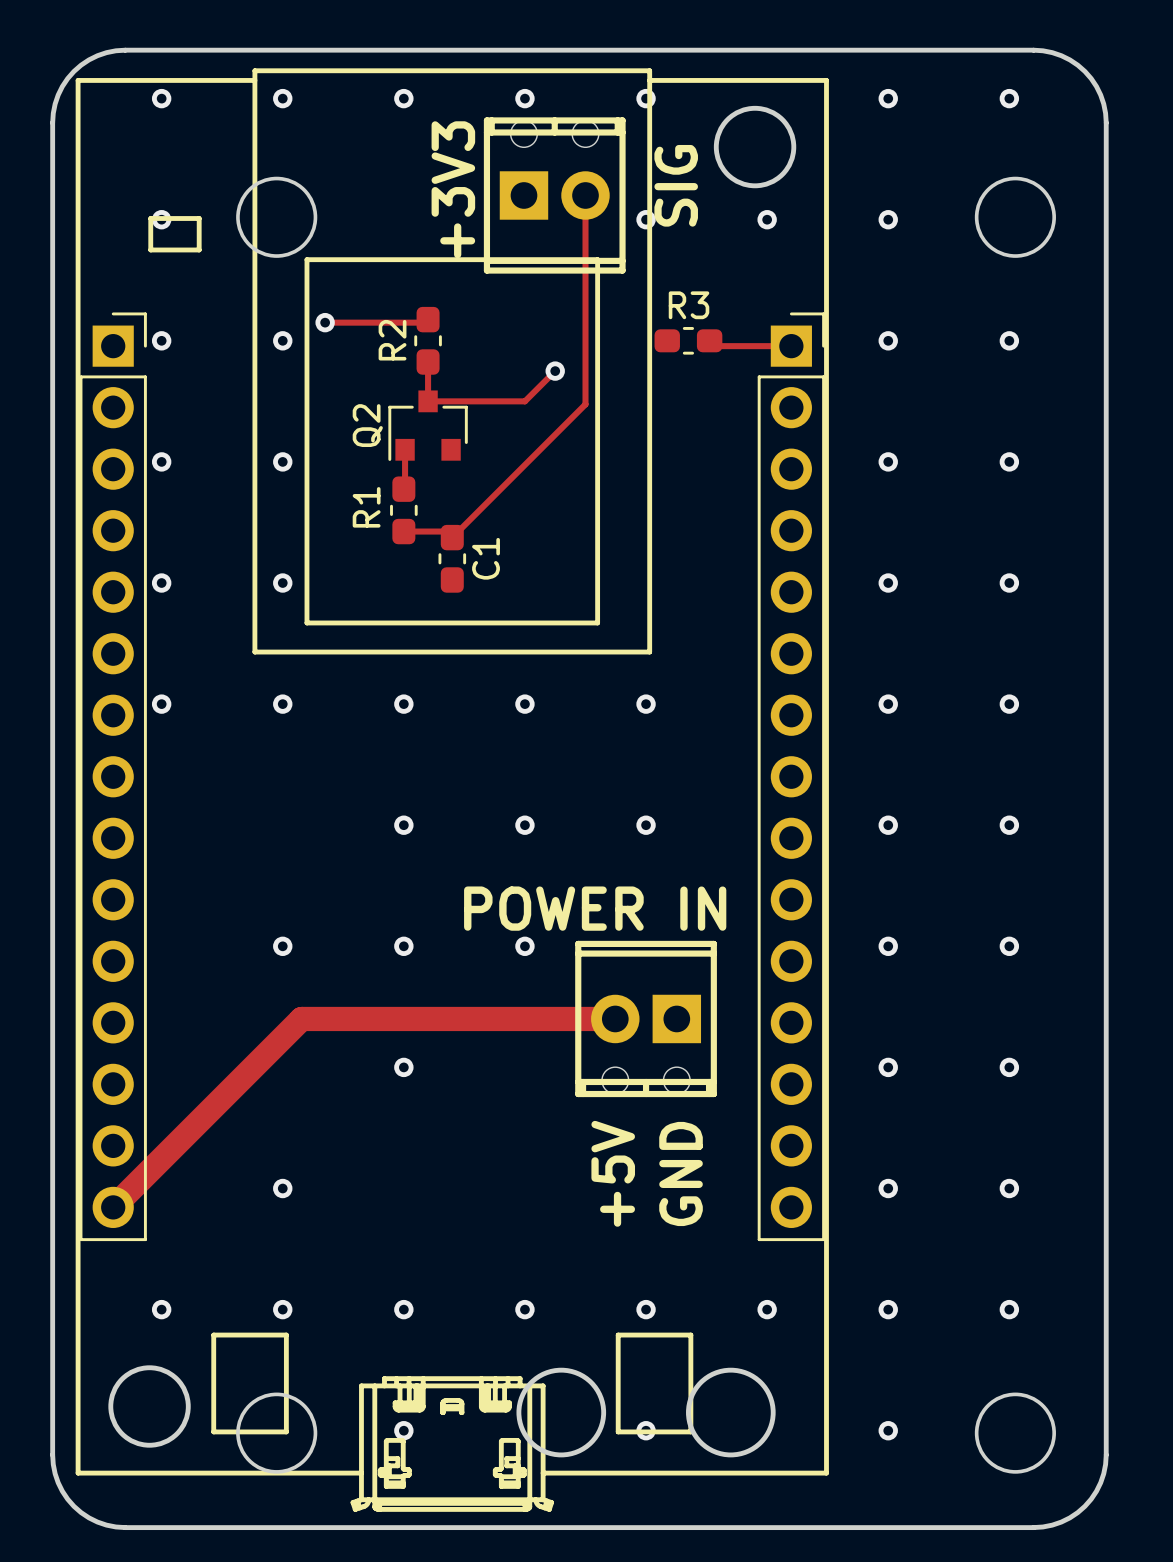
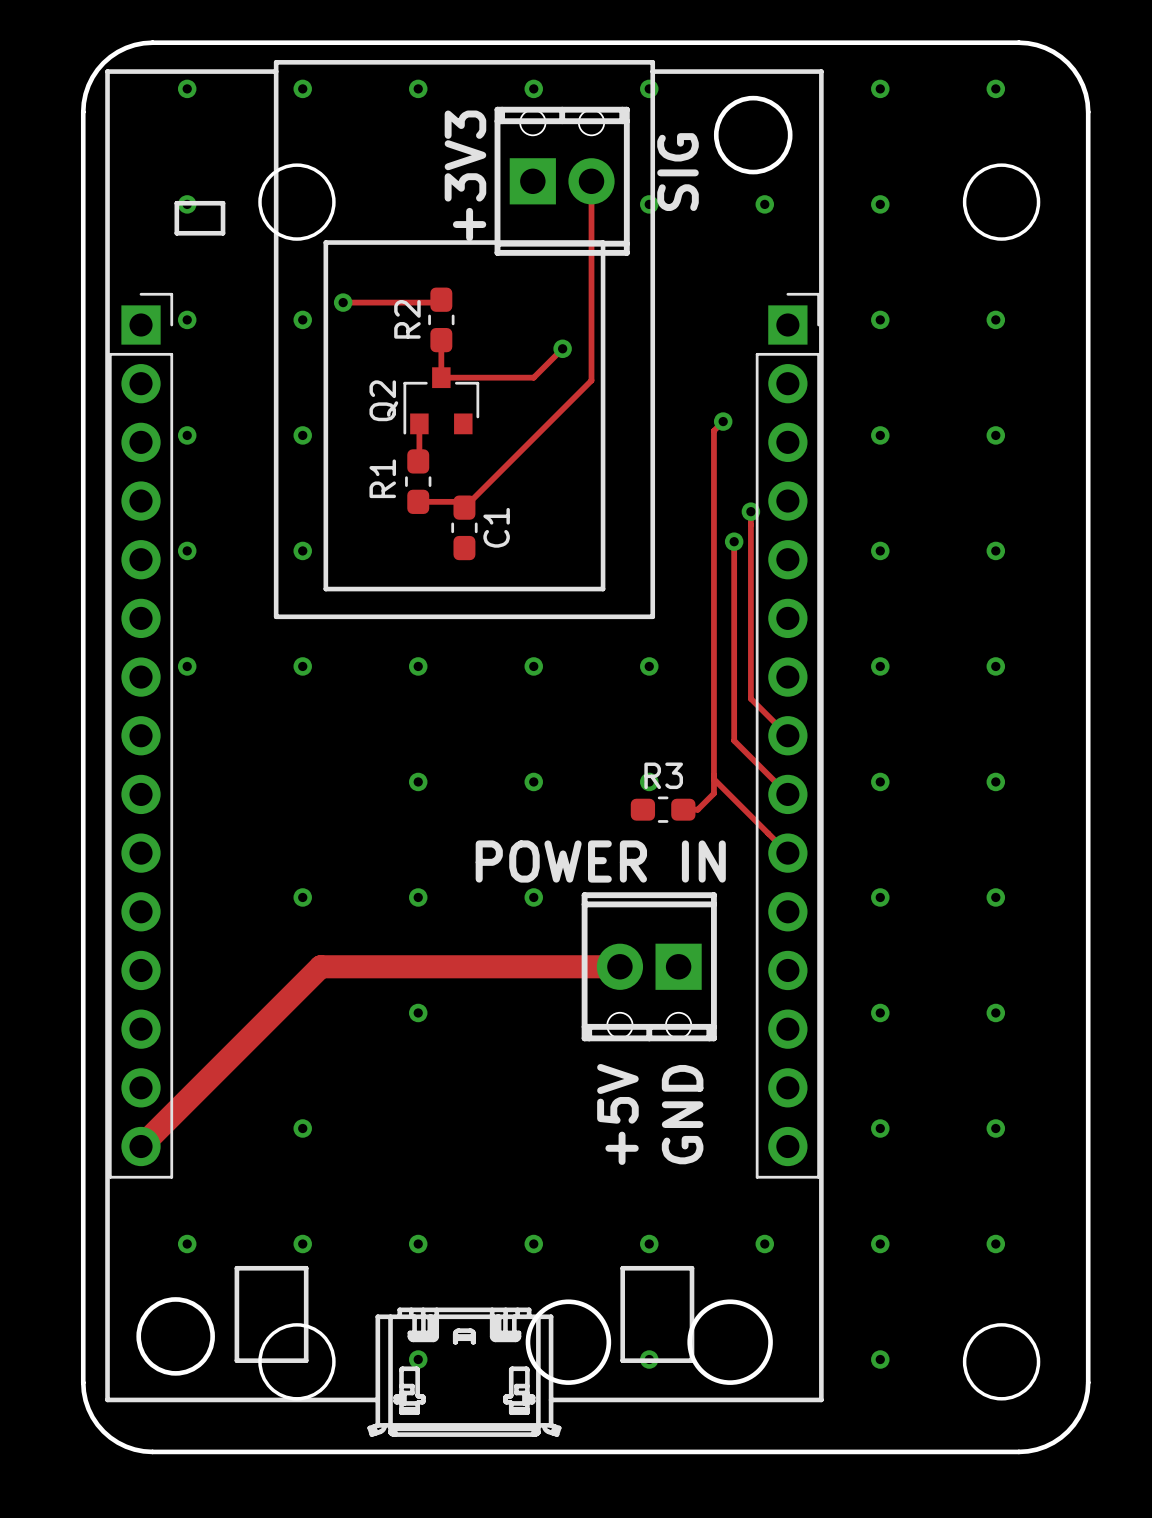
R3 position: (688, 340) -> (663, 809)
track: (709, 340) (714, 346) (791, 346) -> none
track: none -> (723, 421) (713, 430) (713, 793) (697, 809) (683, 809)
via: none -> (723, 421)
track: none -> (750, 511) (750, 698) (787, 735)
via: none -> (750, 511)
track: none -> (734, 541) (734, 740) (787, 794)
via: none -> (734, 541)
track: none -> (713, 779) (787, 853)

